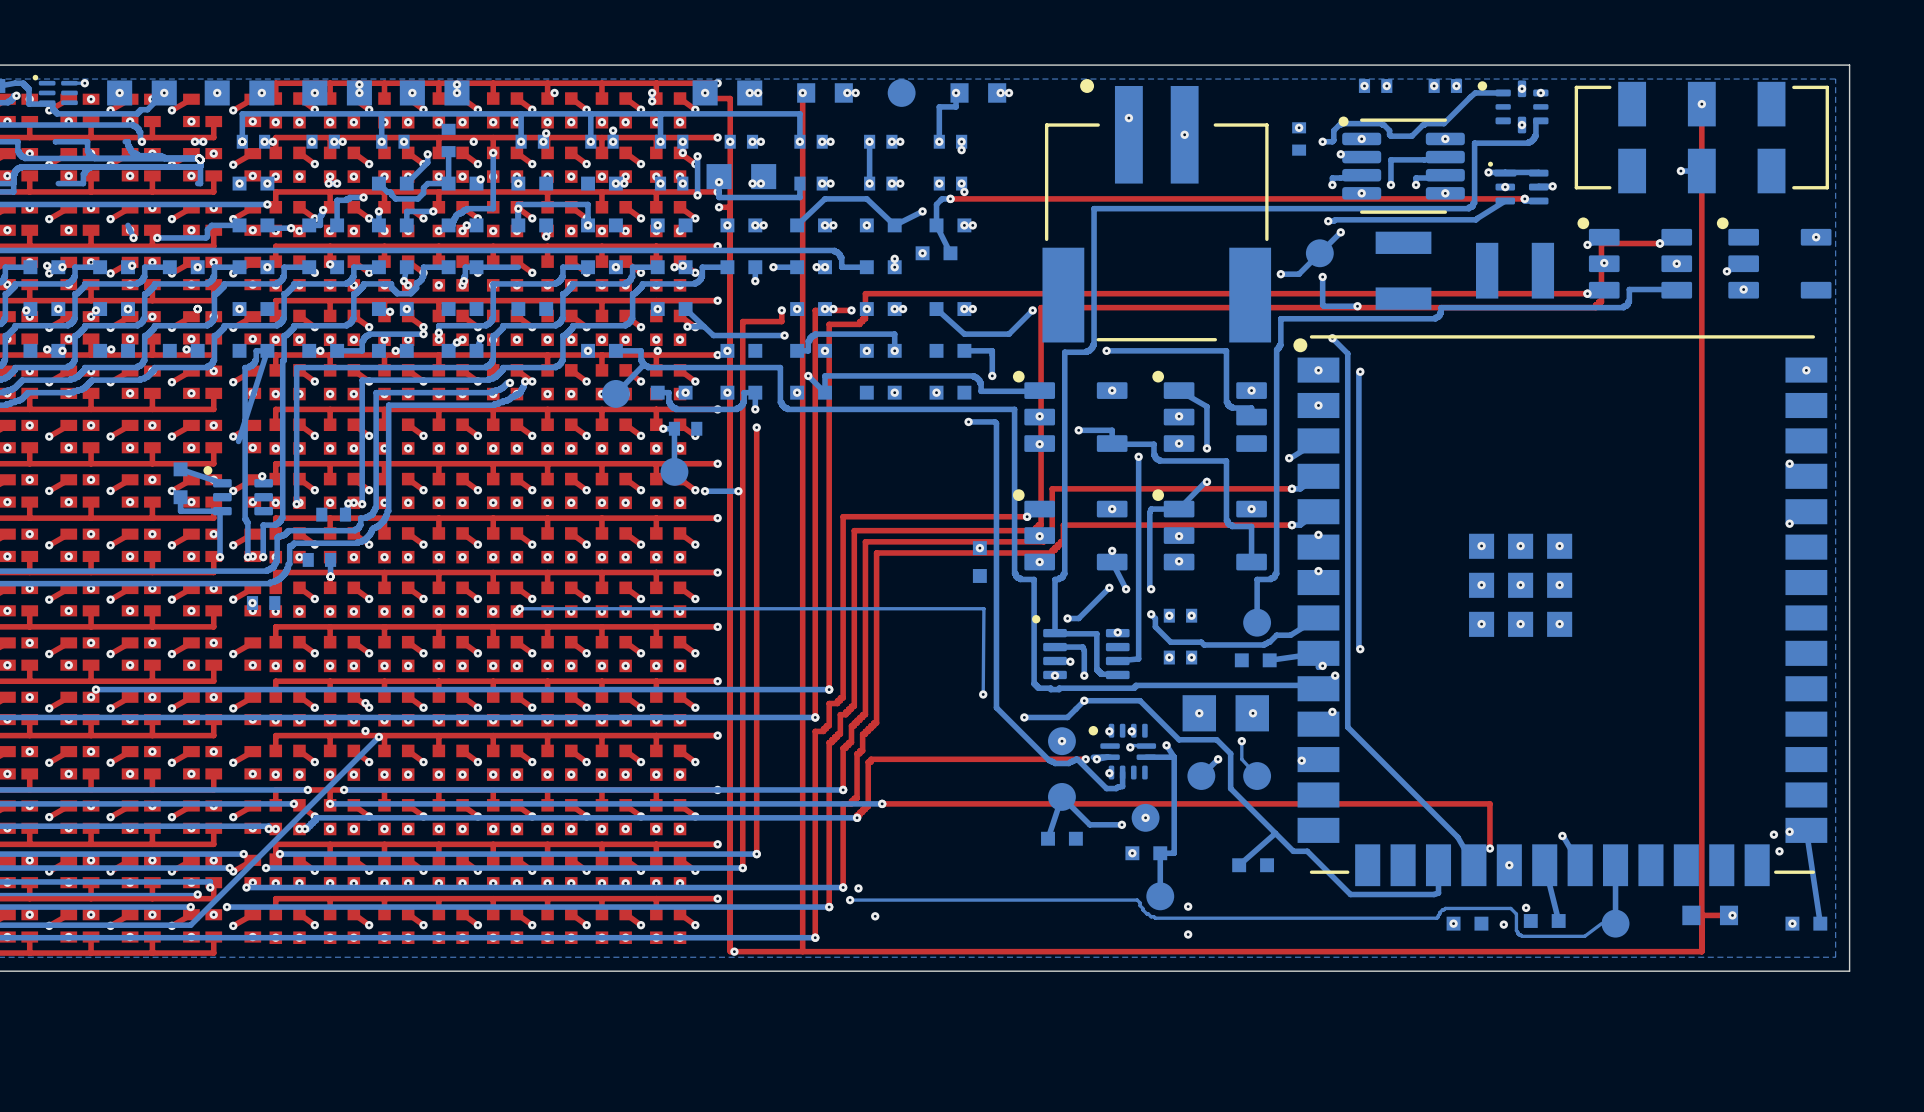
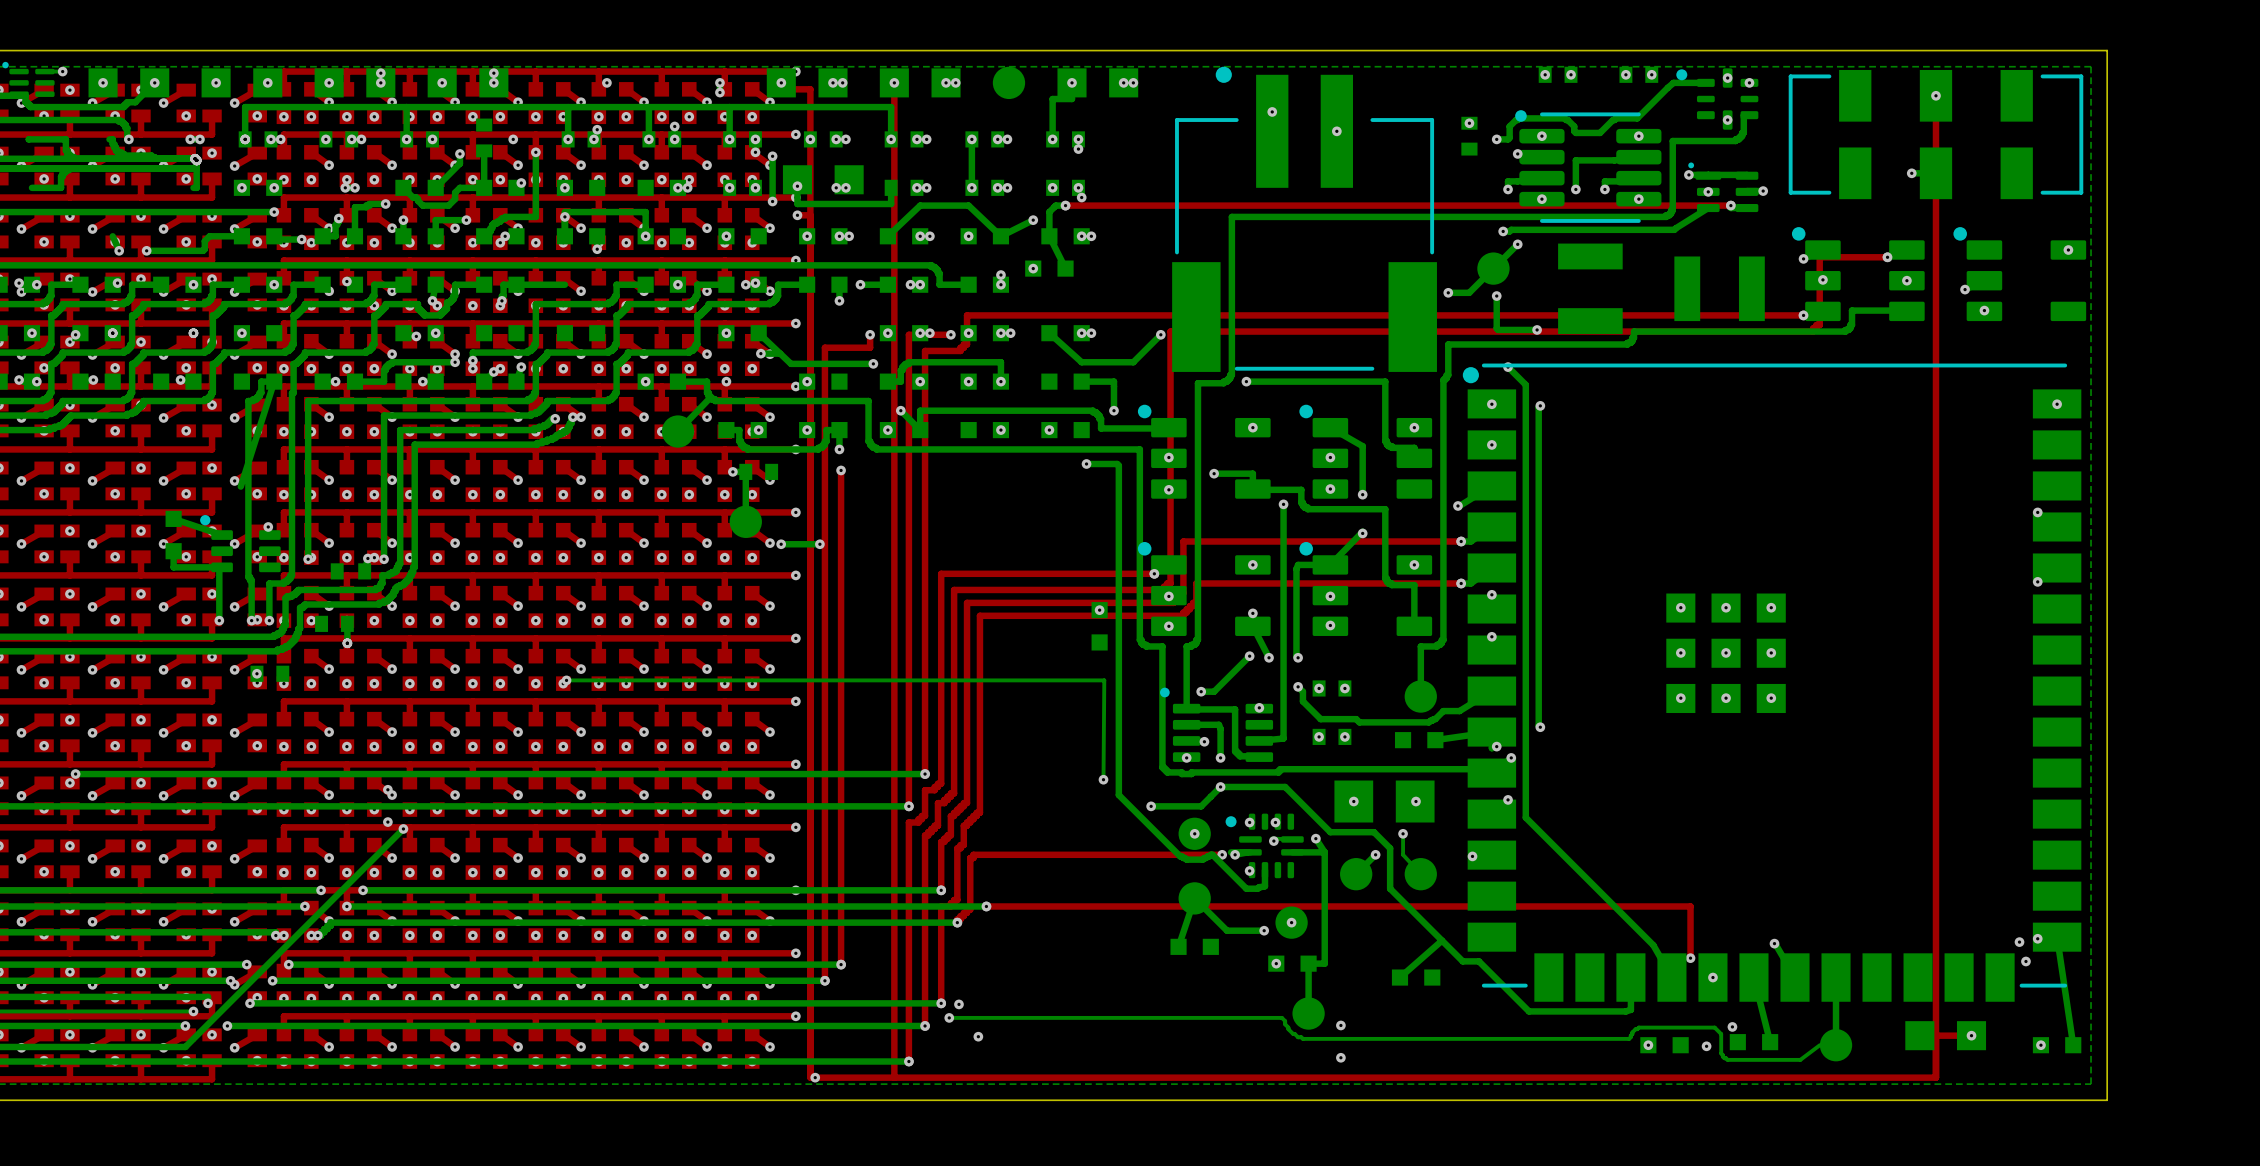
part footprint: [797, 83, 853, 103] -> [879, 68, 961, 98]
part footprint: [950, 83, 1007, 103] -> [1057, 68, 1139, 98]
part footprint: [1682, 905, 1739, 926] -> [1905, 1021, 1987, 1051]

